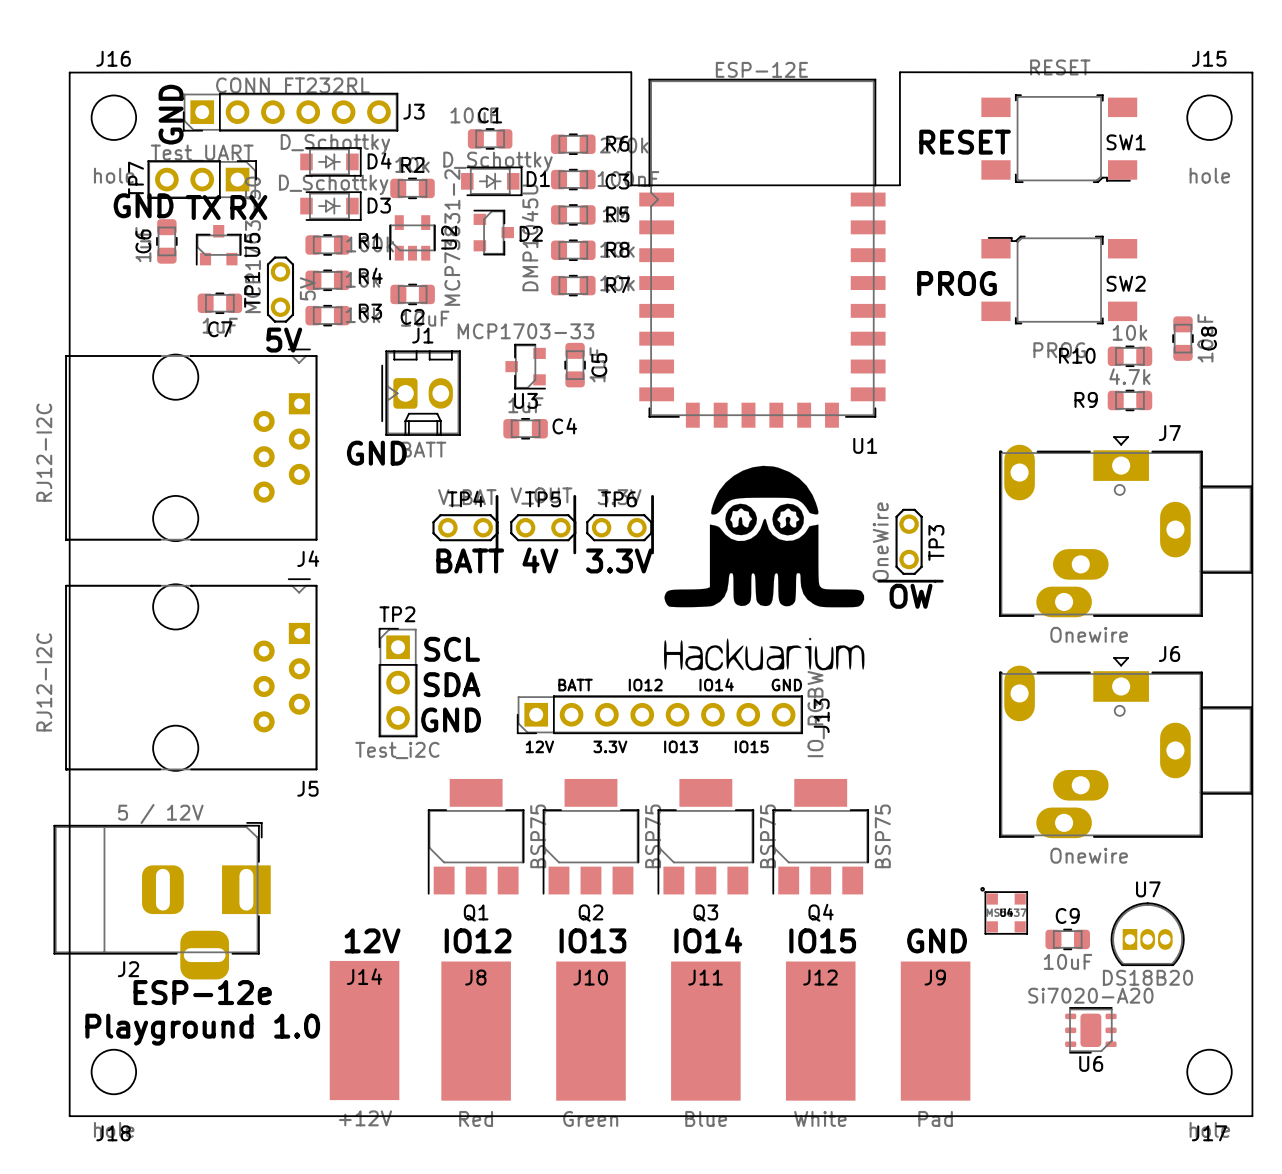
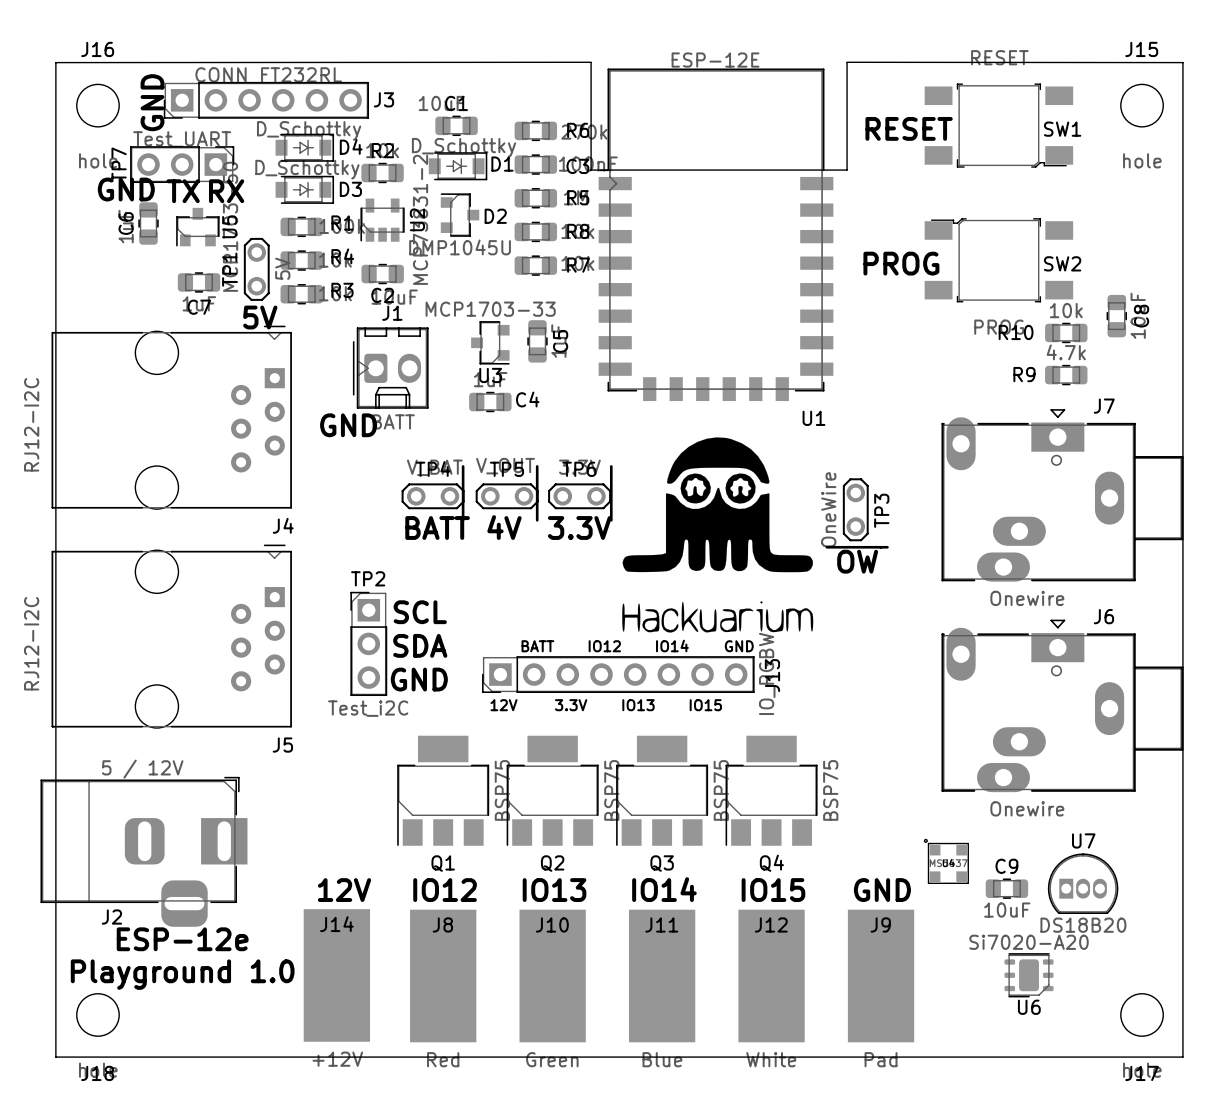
D2 value rotation: 0° (530, 237) -> 90° clockwise (460, 247)

